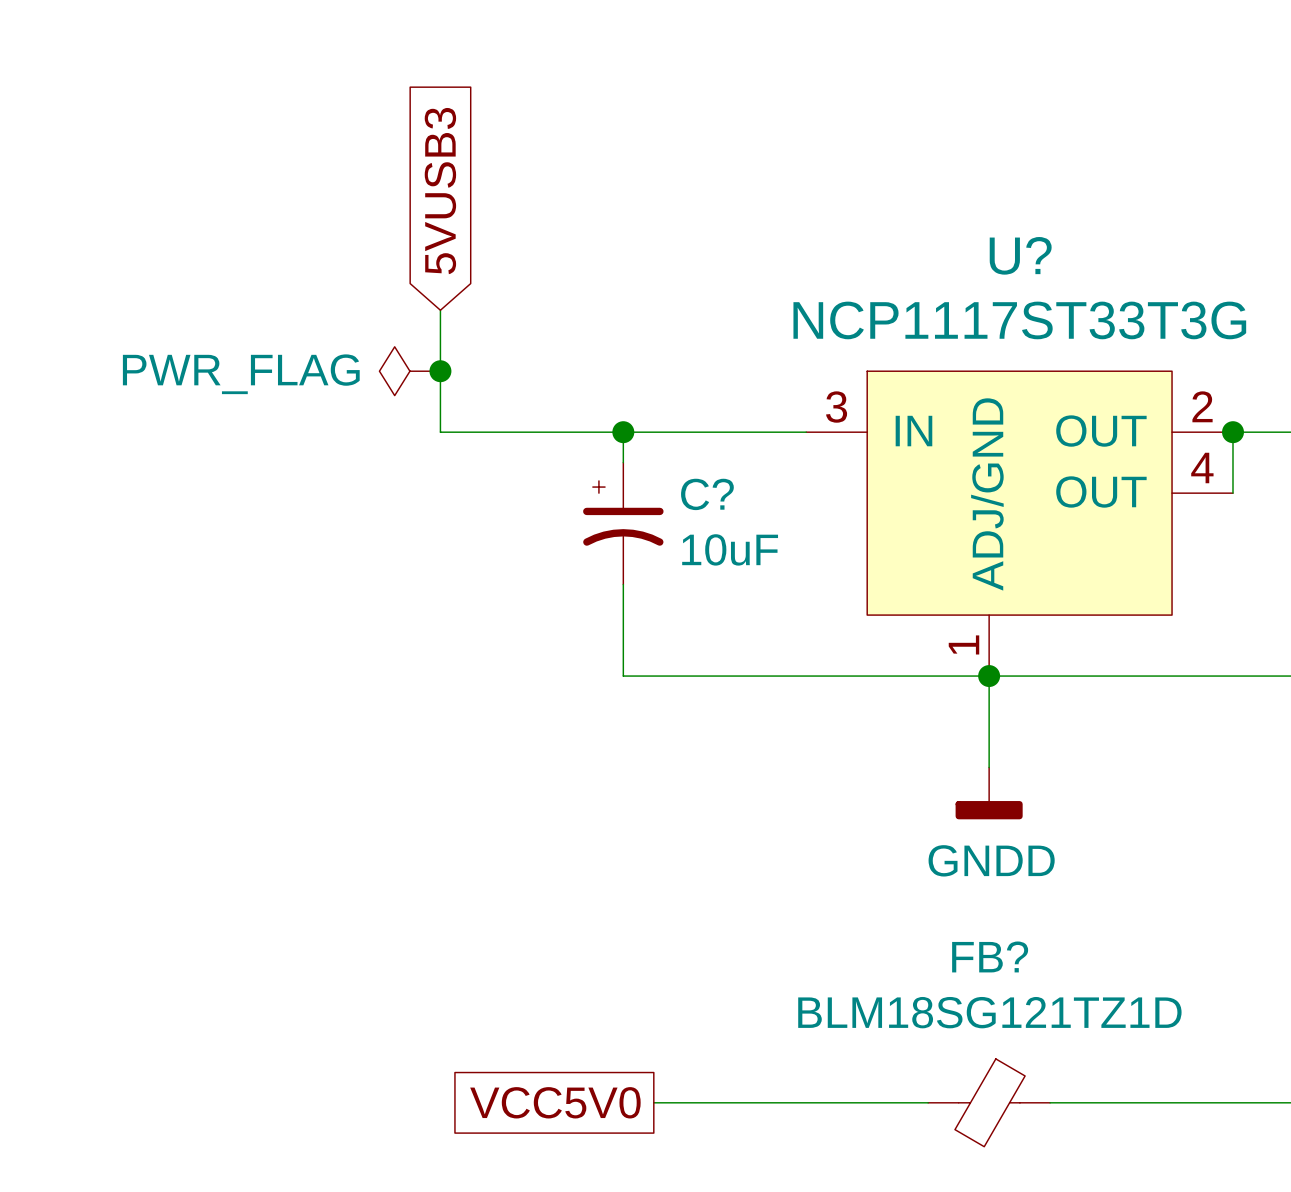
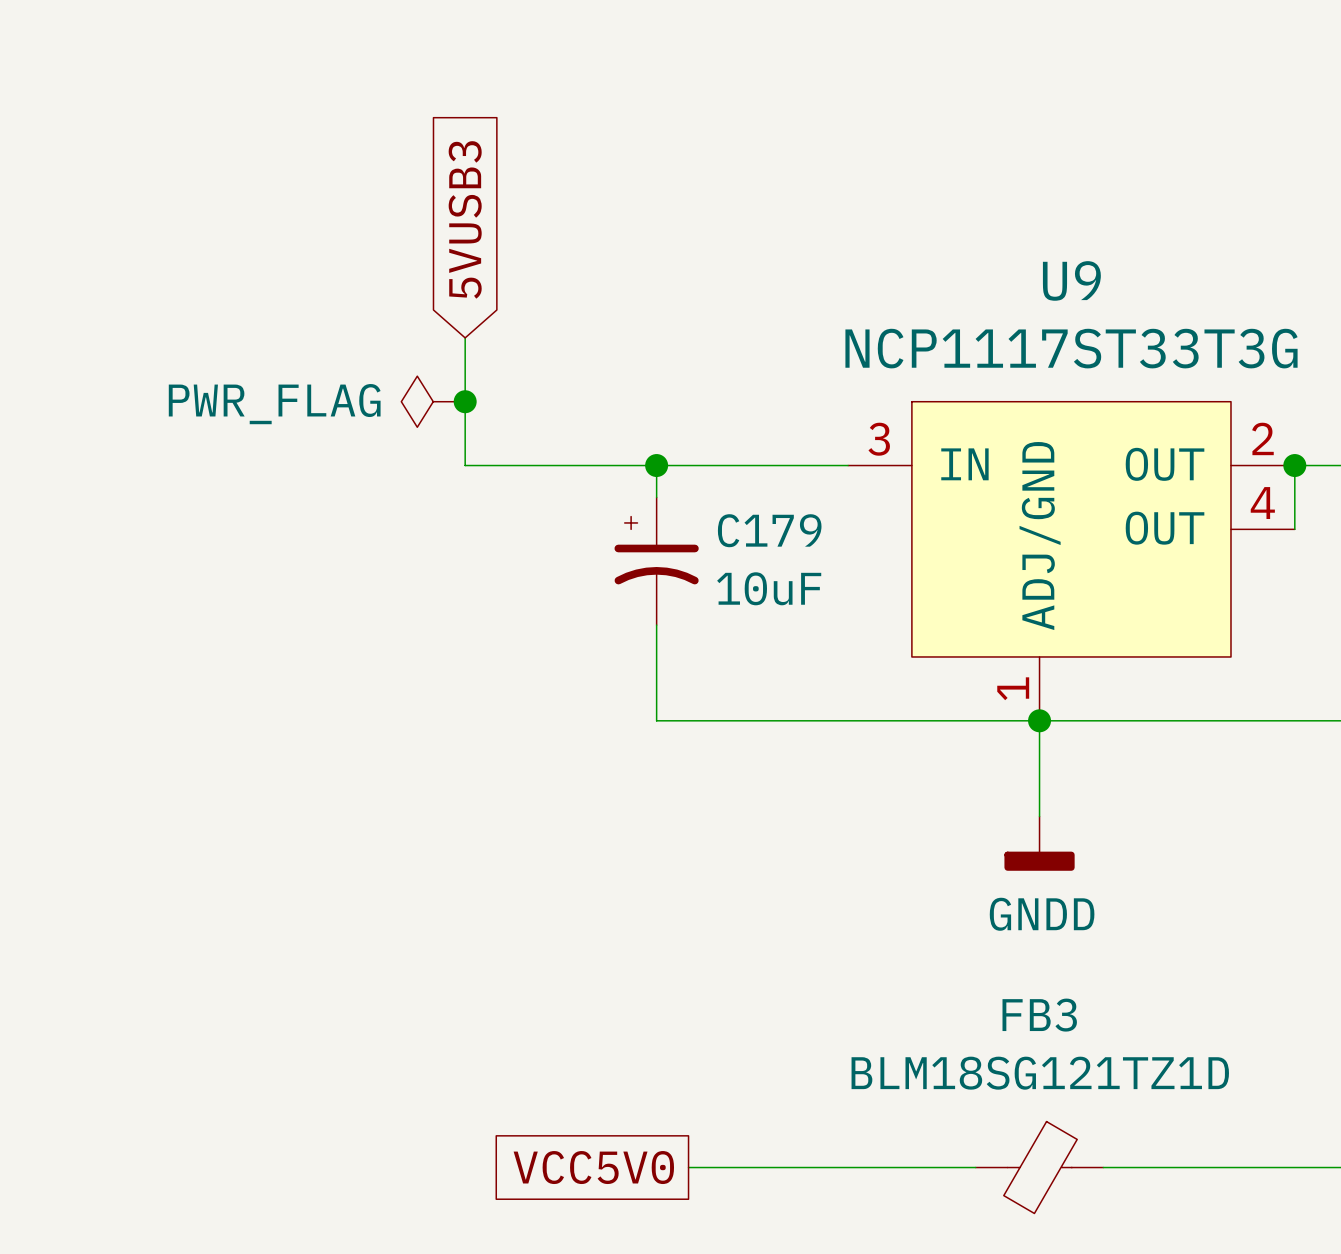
U? name: U? (1020, 255) -> U9 (1071, 280)
C? name: C? (707, 494) -> C179 (769, 530)
FB? name: FB? (990, 956) -> FB3 (1039, 1015)

